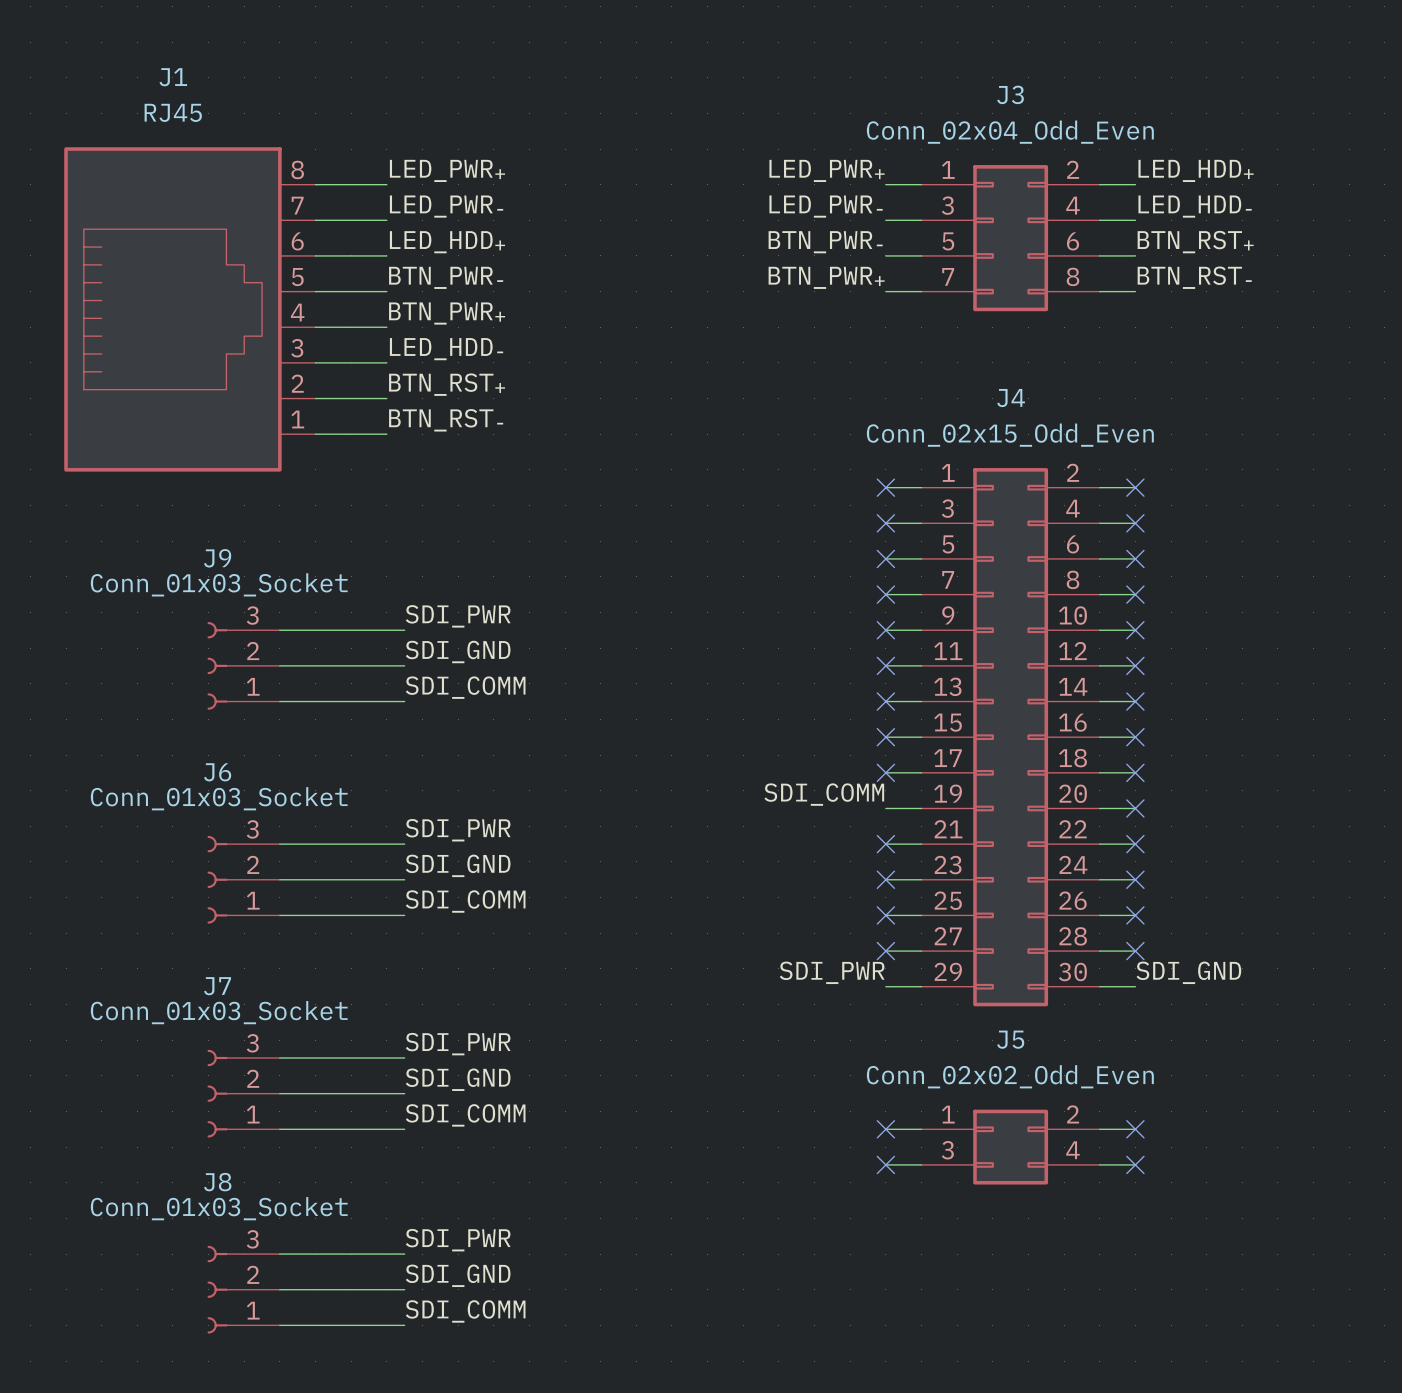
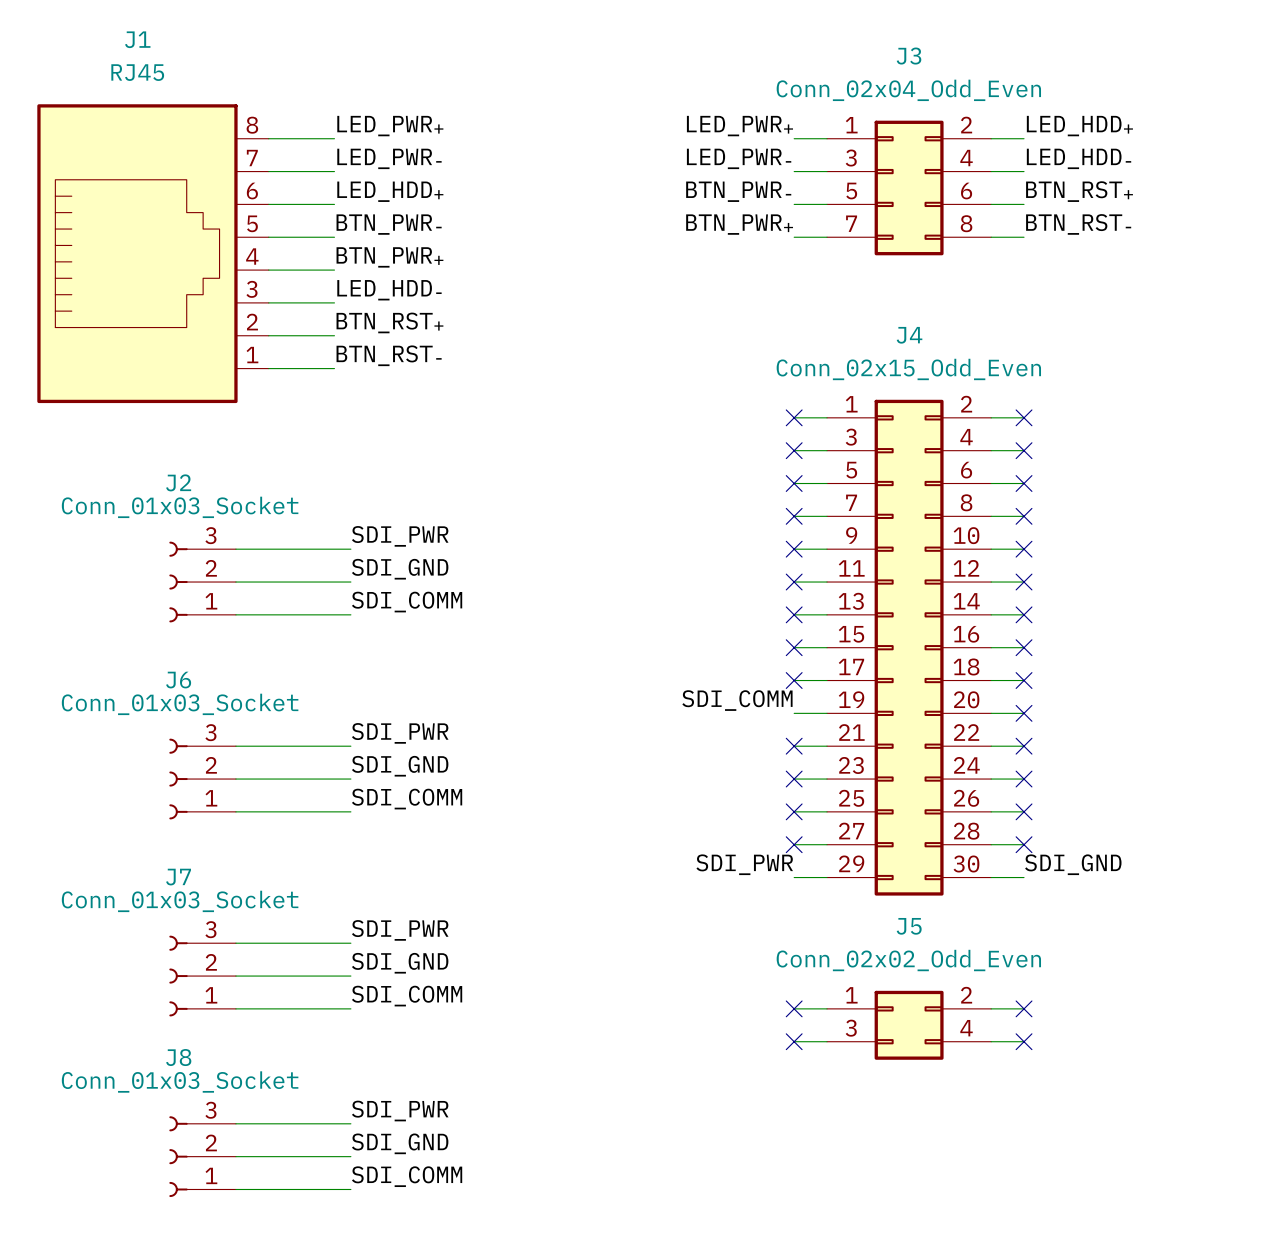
J9 name: J9 (217, 558) -> J2 (178, 482)

